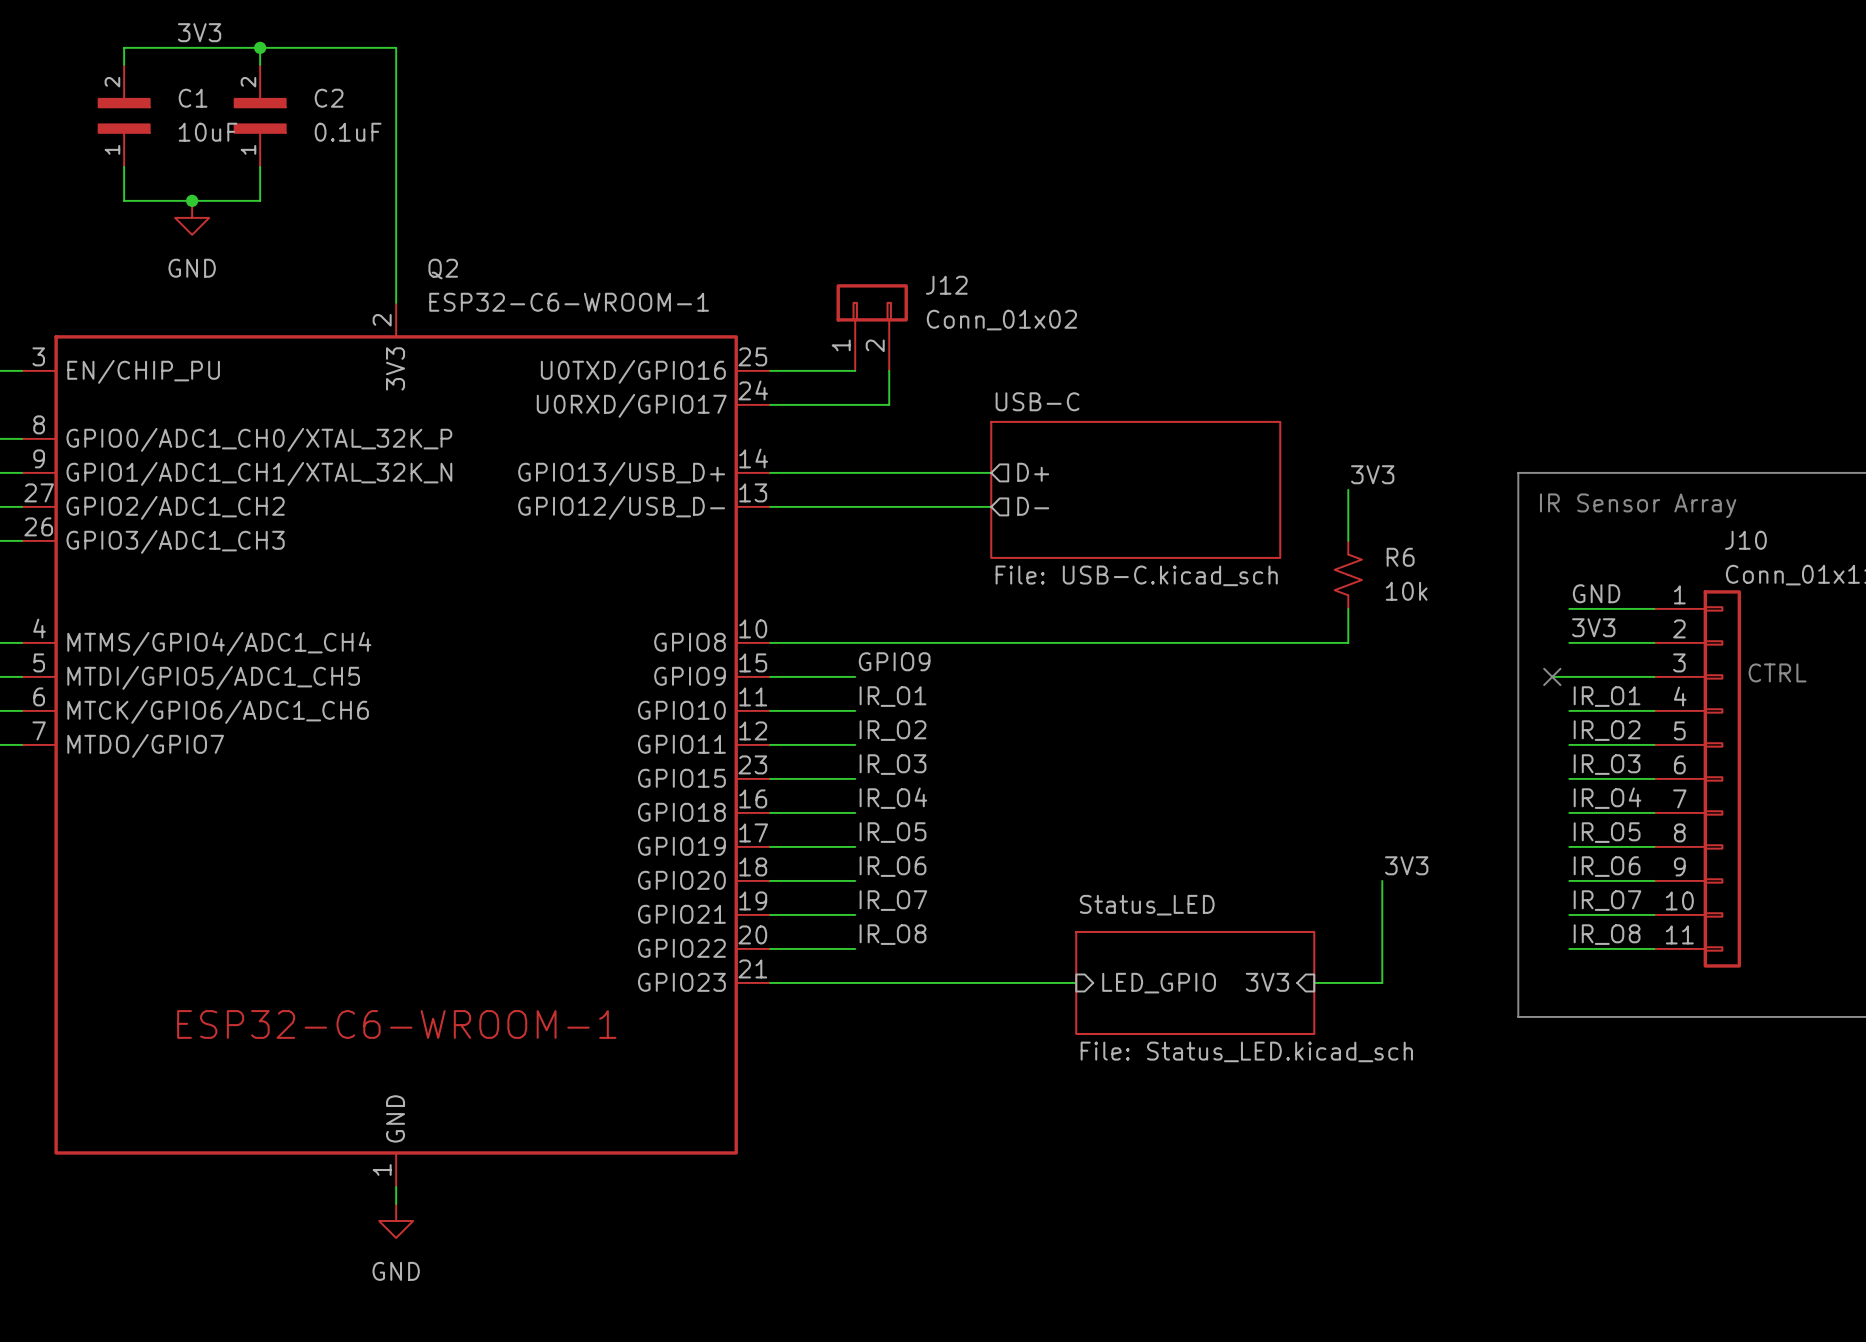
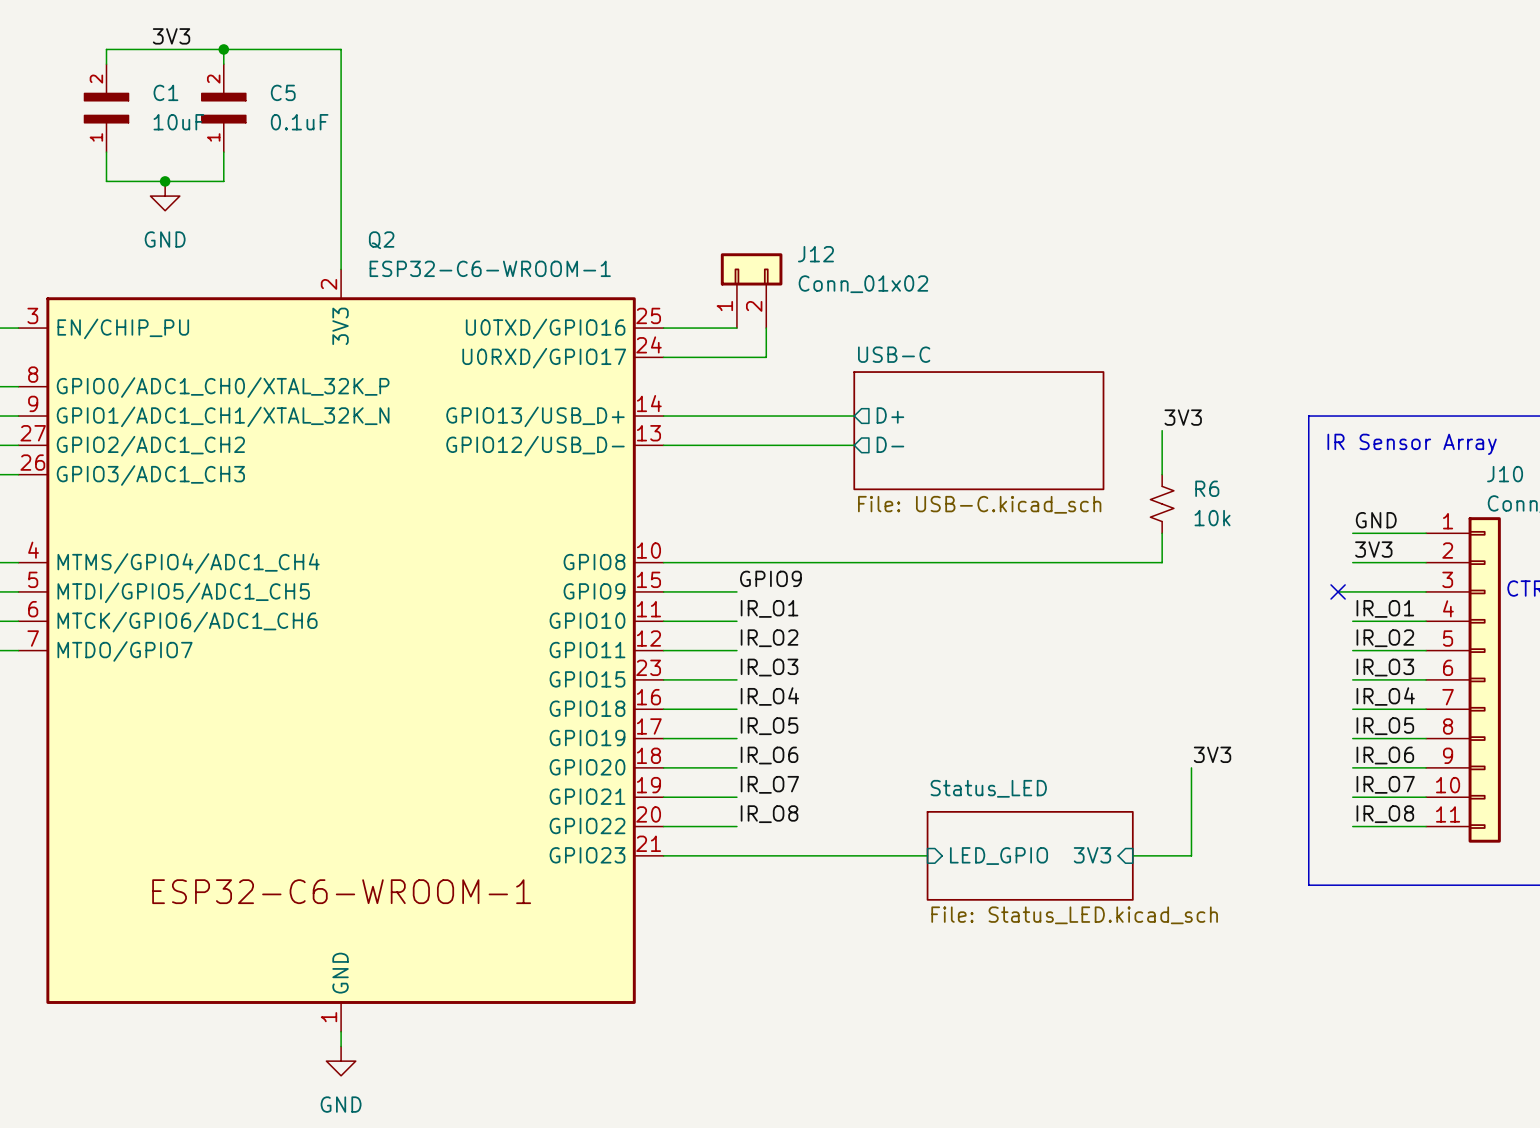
C2 name: C2 (329, 98) -> C5 (283, 92)

